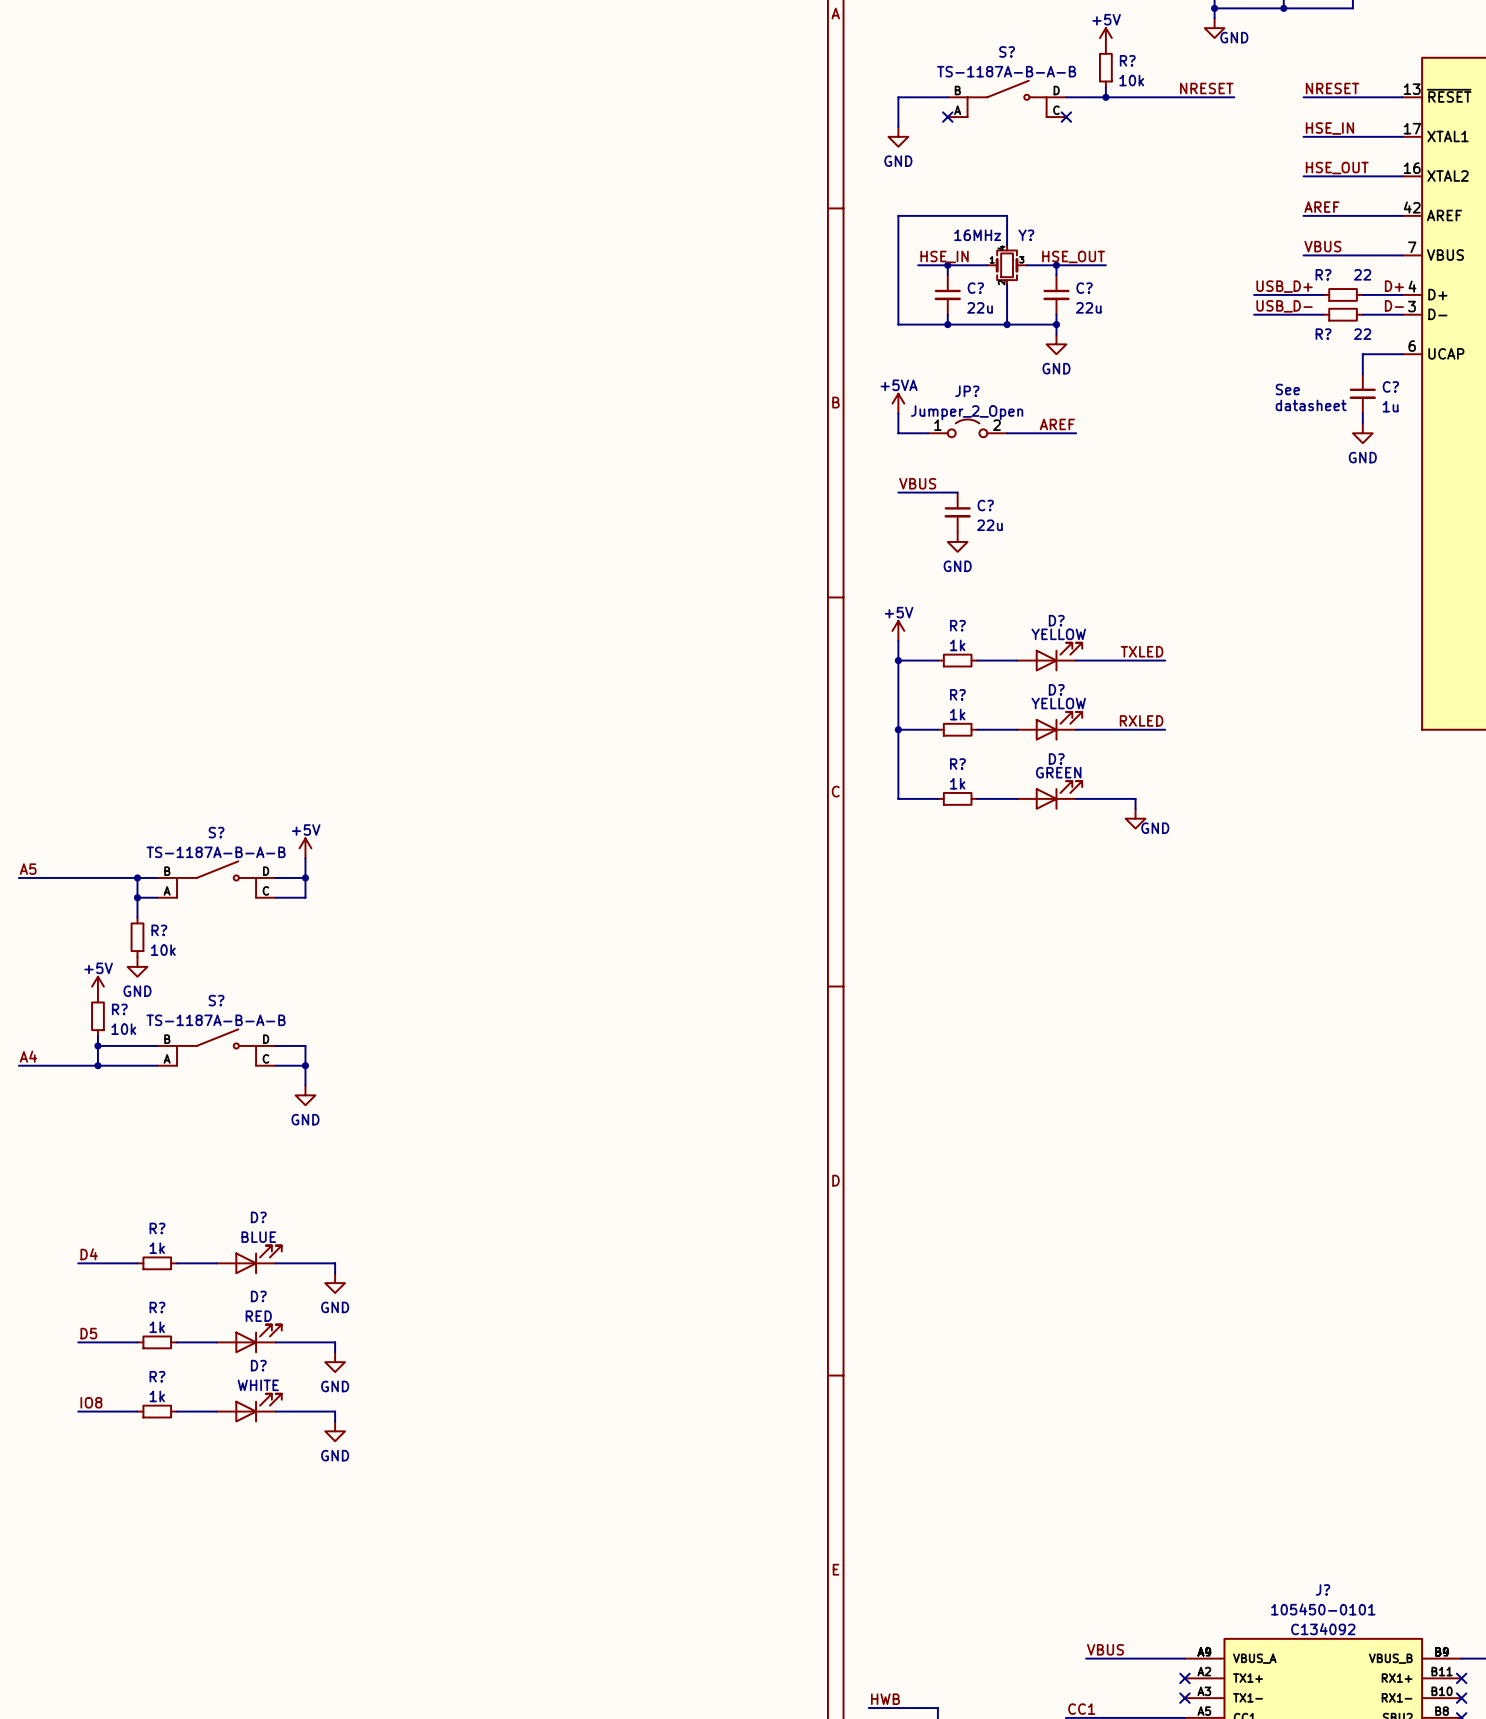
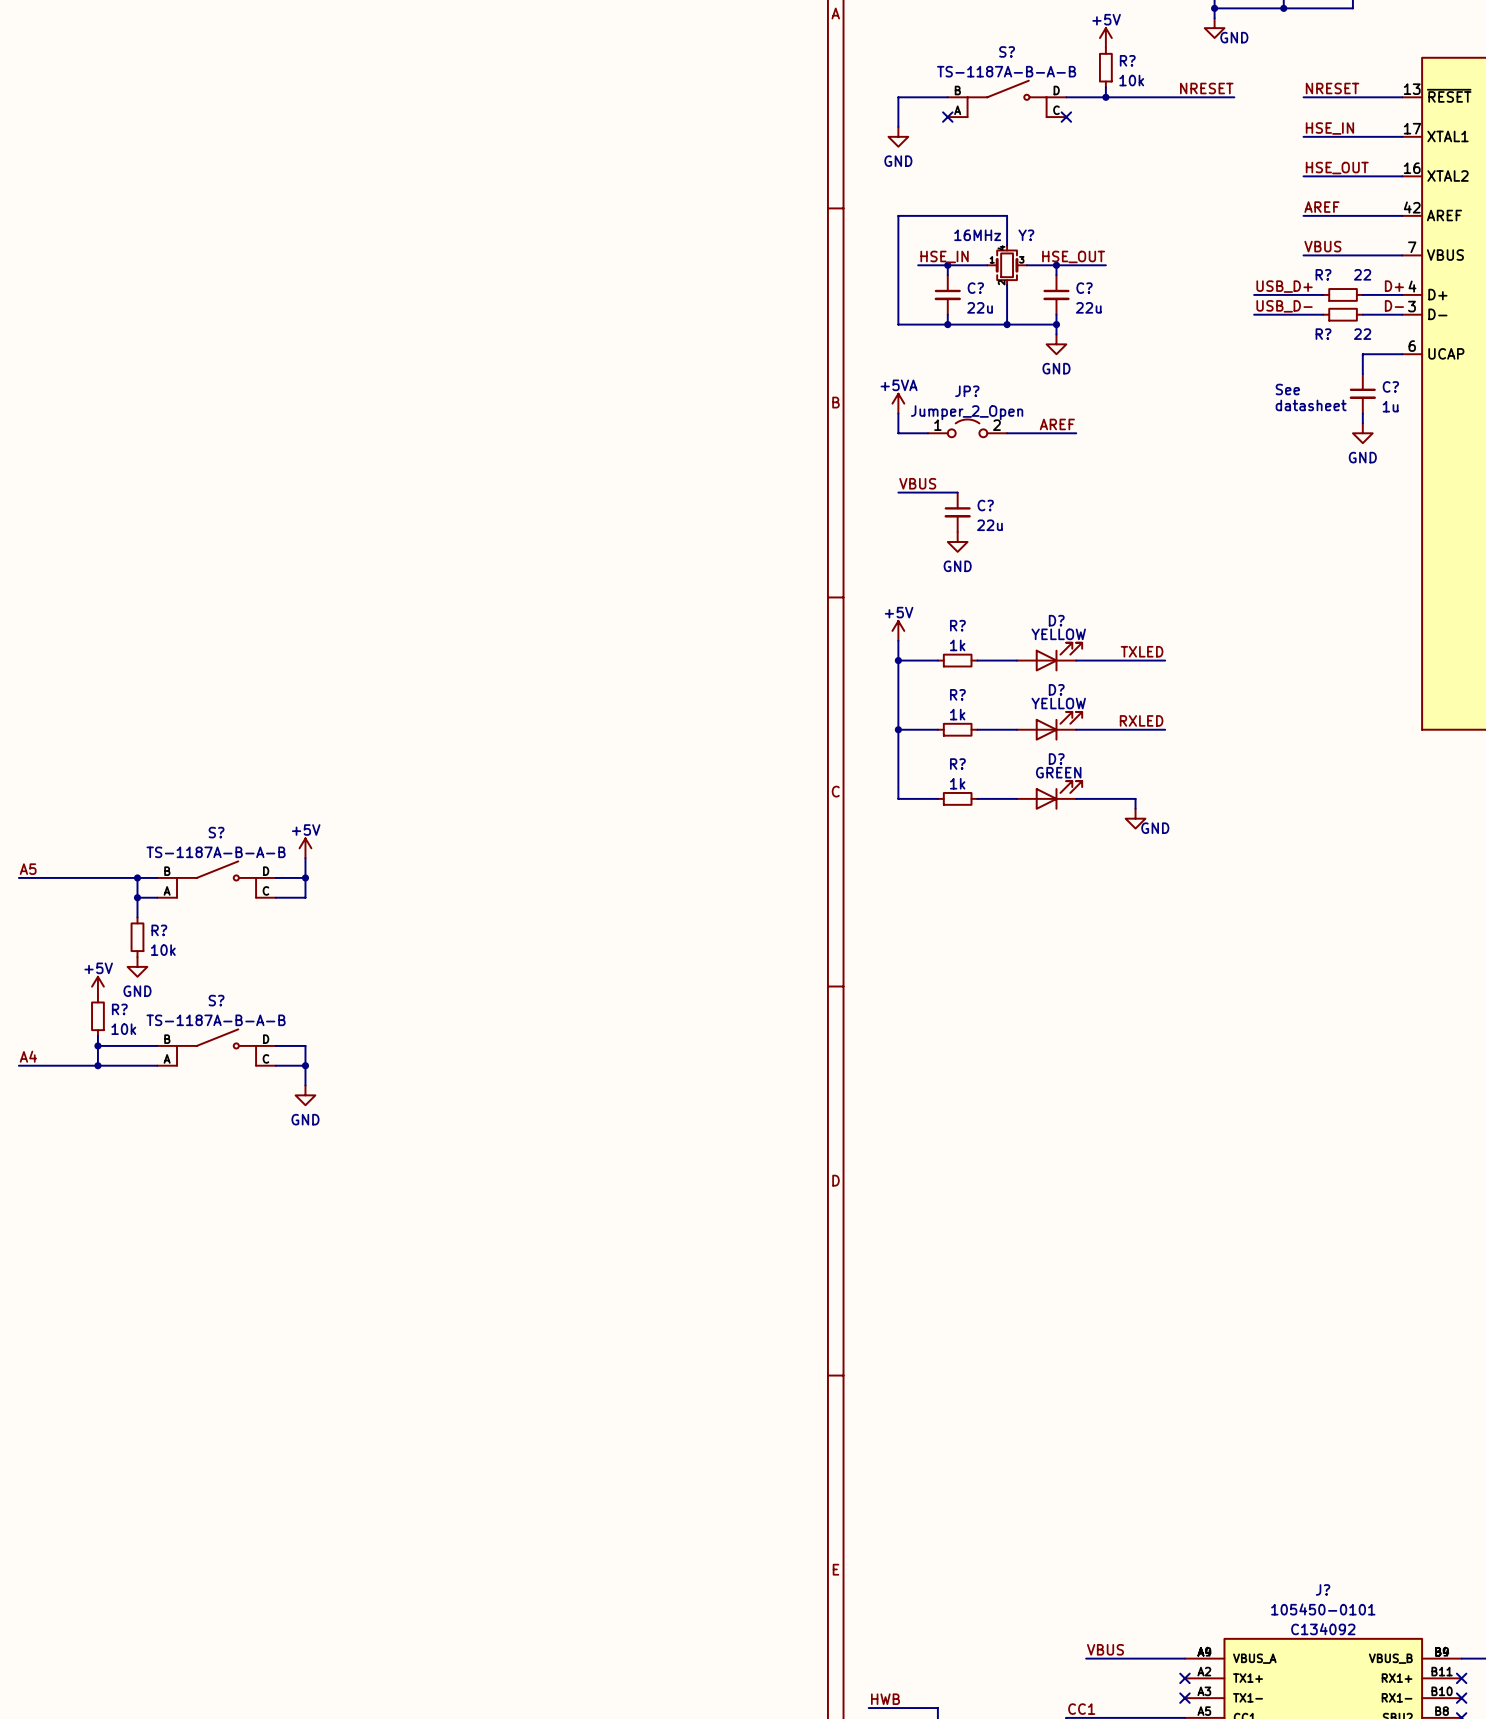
label: D4 (89, 1254) -> none
D?: BLUE (249, 1259) -> none
wire: (78, 1263) (137, 1263) -> none
R?: 1k (157, 1263) -> none
wire: (177, 1263) (216, 1263) -> none
wire: (275, 1263) (335, 1263) (335, 1273) -> none
power symbol: GND (335, 1283) -> none
label: D5 (88, 1333) -> none
D?: RED (249, 1338) -> none
wire: (78, 1342) (137, 1342) -> none
R?: 1k (157, 1342) -> none
wire: (177, 1342) (216, 1342) -> none
wire: (275, 1342) (335, 1342) (335, 1352) -> none
power symbol: GND (335, 1362) -> none
label: IO8 (91, 1402) -> none
D?: WHITE (249, 1408) -> none
wire: (78, 1411) (137, 1411) -> none
R?: 1k (157, 1411) -> none
wire: (177, 1411) (216, 1411) -> none
wire: (275, 1411) (335, 1411) (335, 1421) -> none
power symbol: GND (335, 1431) -> none

